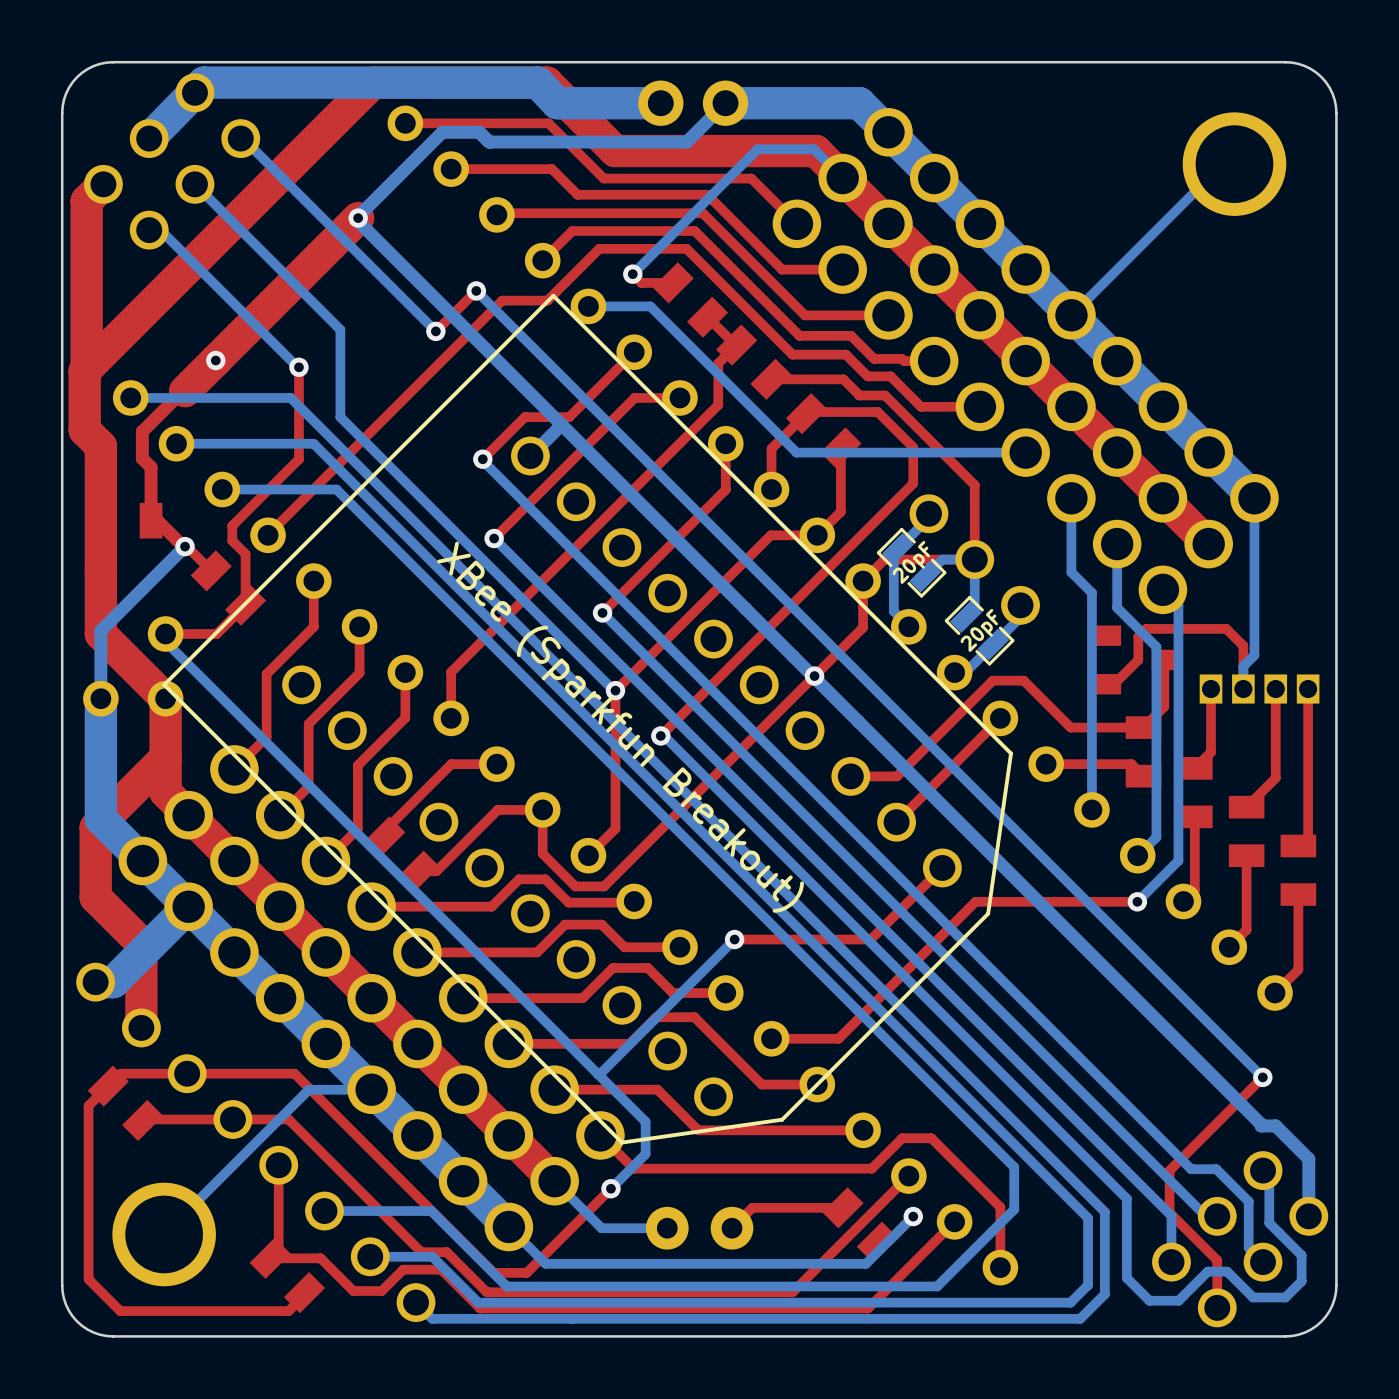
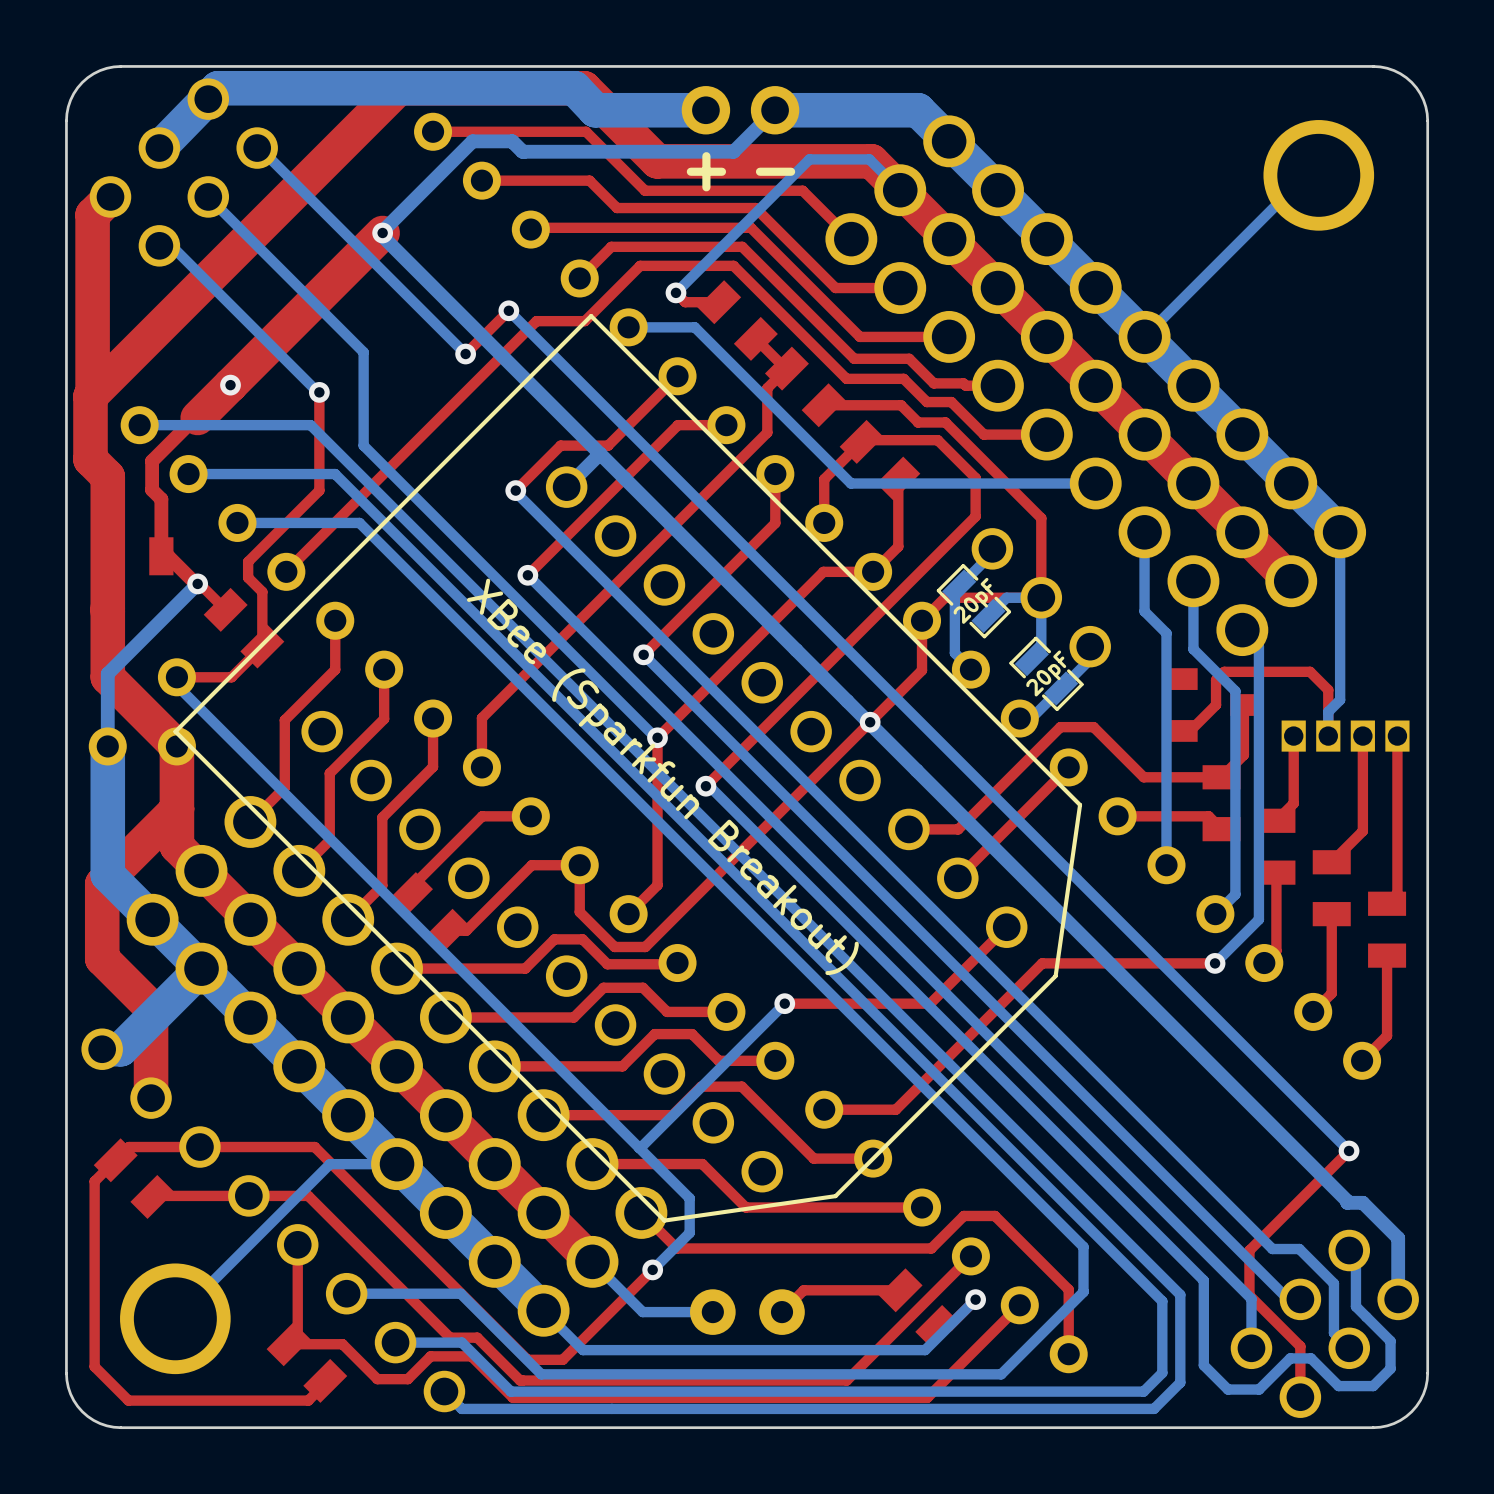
text: none -> + (706, 171)
text: none -> - (775, 171)

